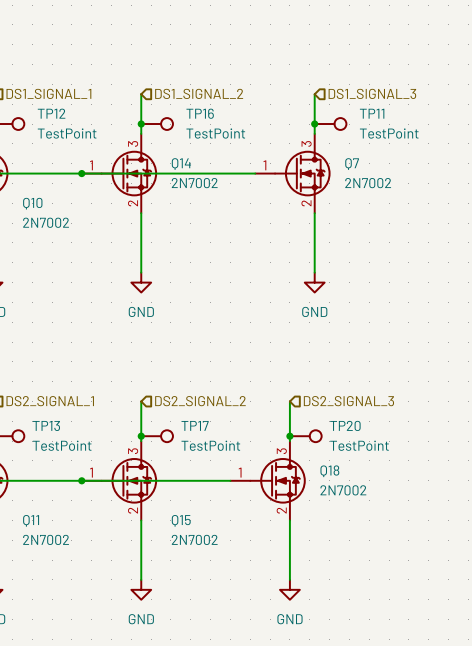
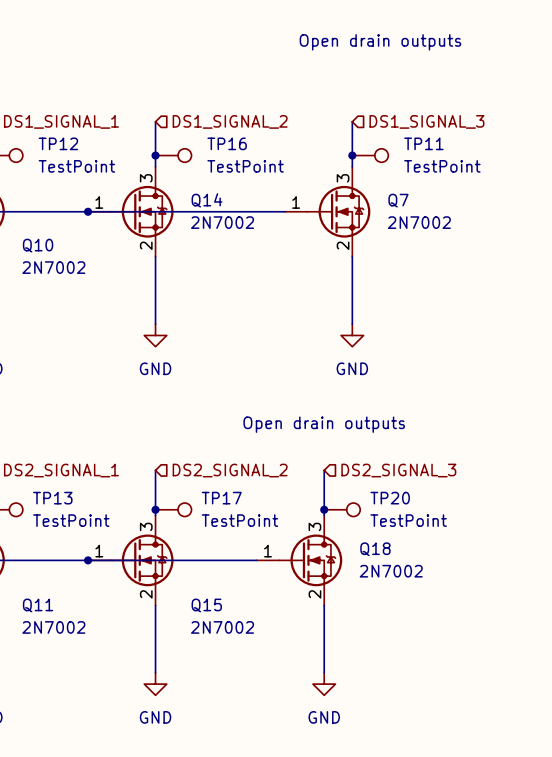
text: none -> Open drain outputs (380, 42)
text: none -> Open drain outputs (324, 424)

